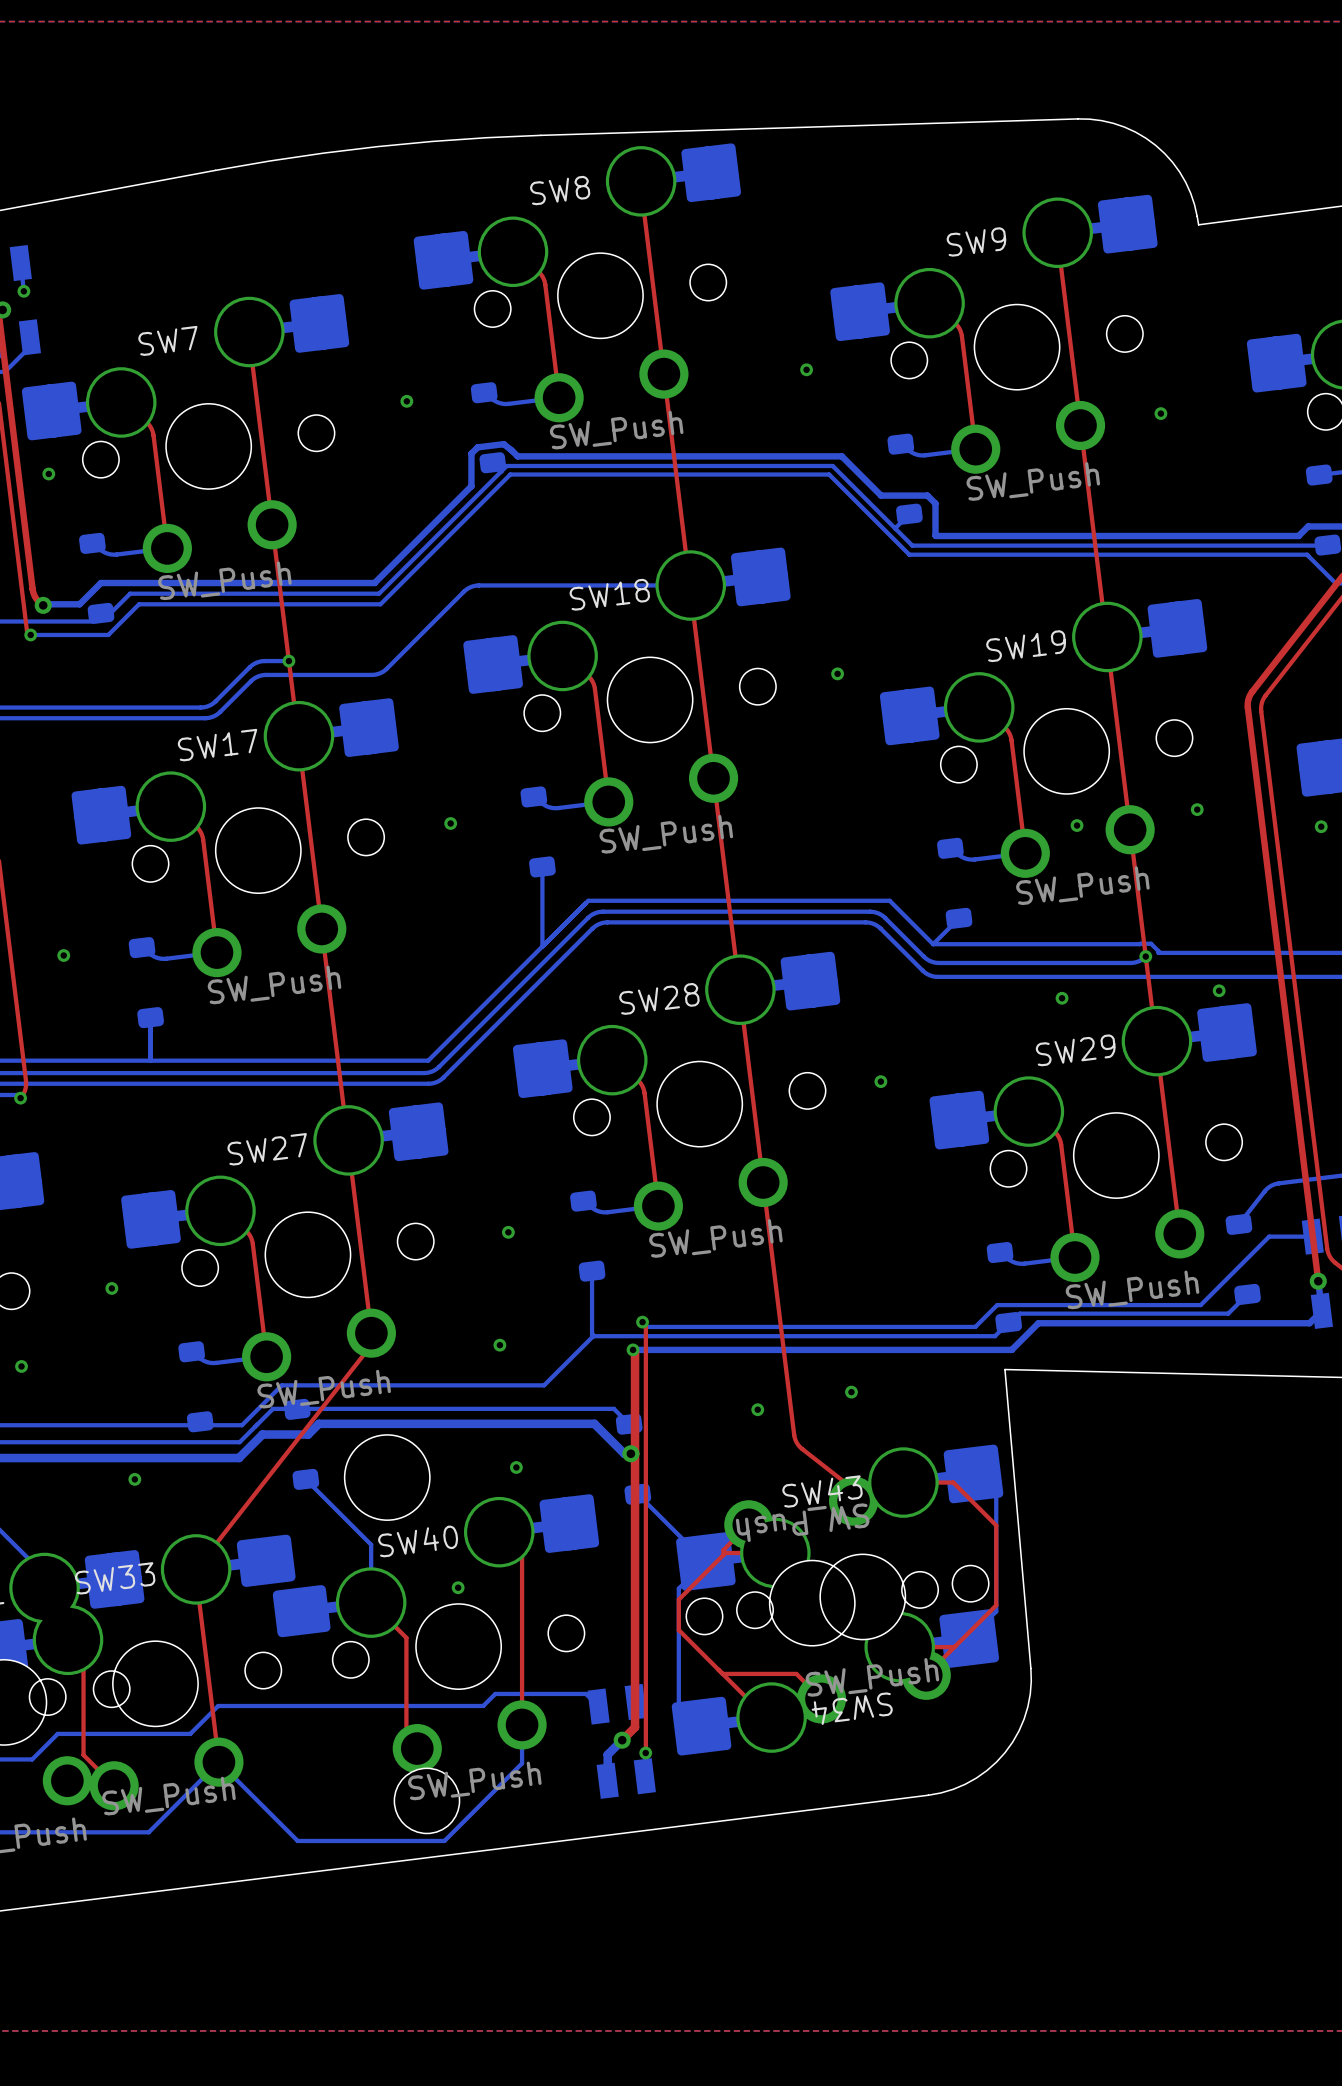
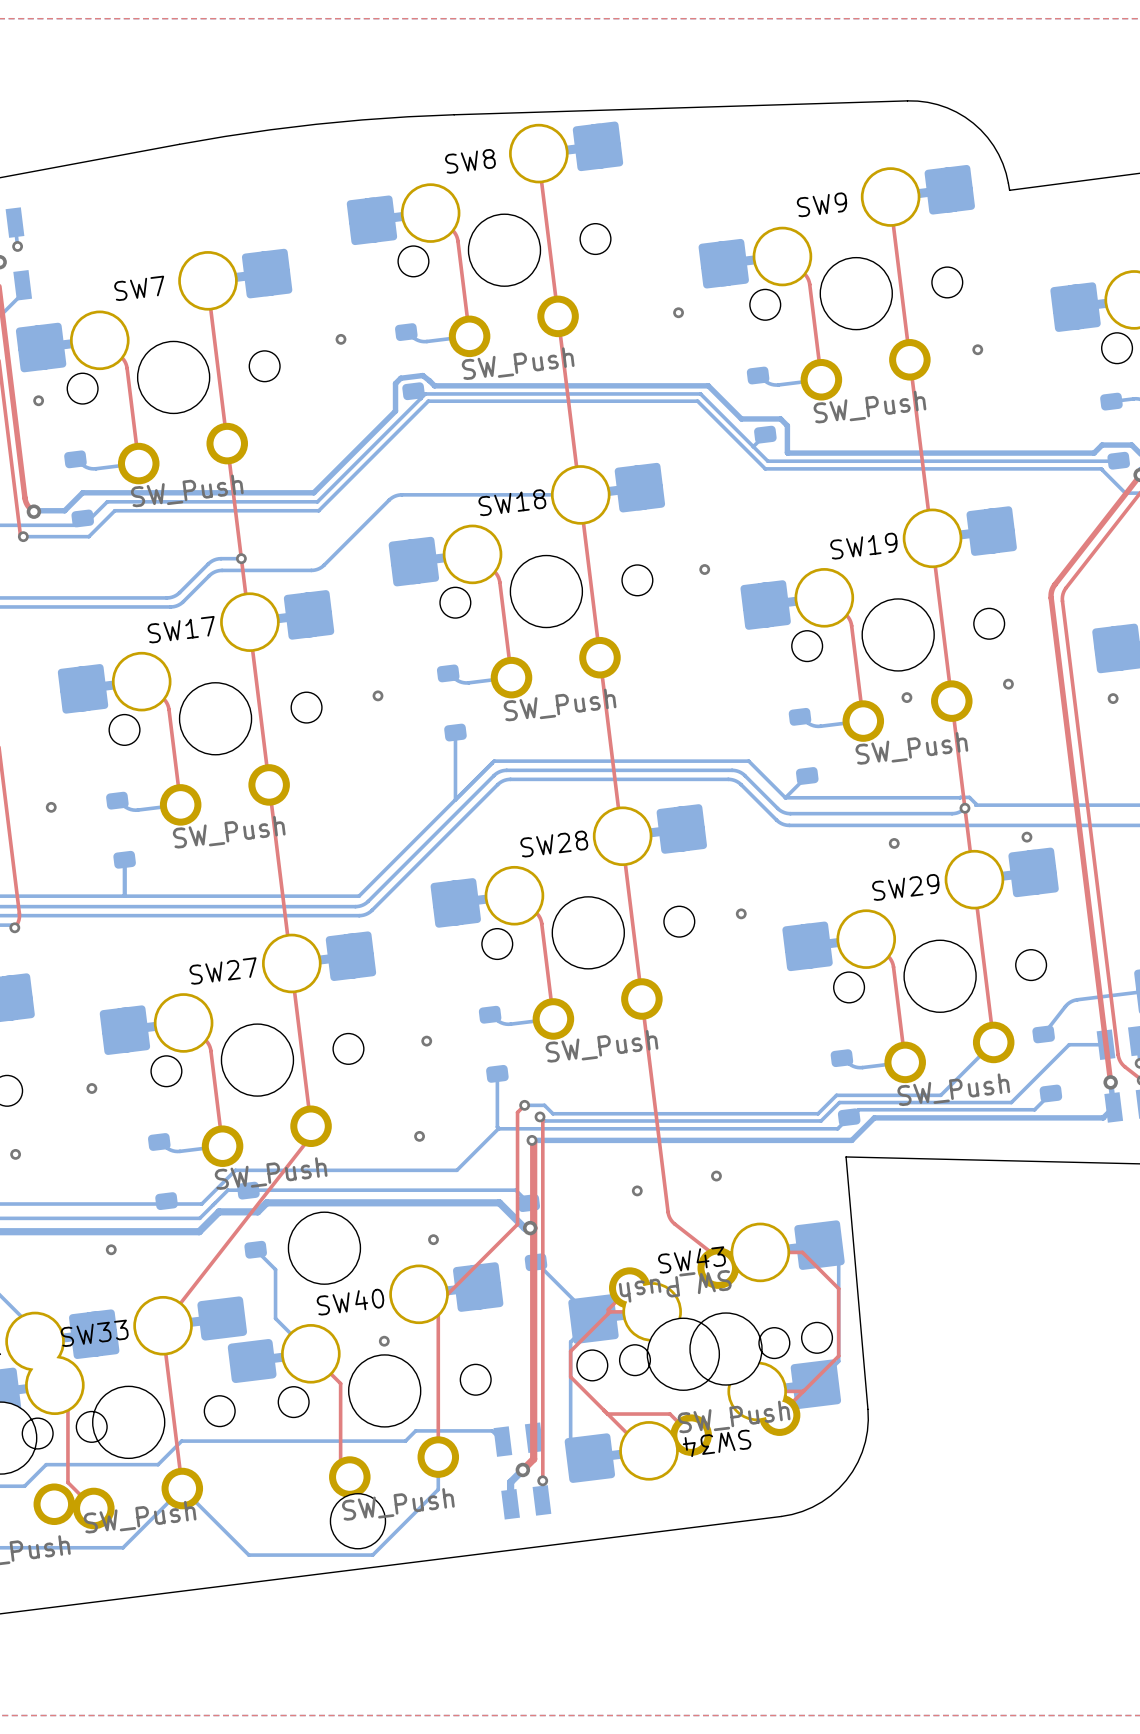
bottom track: none -> (993, 1042) (940, 1095) (836, 1095) (818, 1113) (552, 1113) (544, 1105) (524, 1105)
top track: none -> (524, 1105) (517, 1112) (517, 1224) (447, 1294) (419, 1294)
via: none -> (524, 1105)
bottom track: (329, 1502) (371, 1544) (371, 1602) -> (275, 1269) (275, 1318) (310, 1353)

